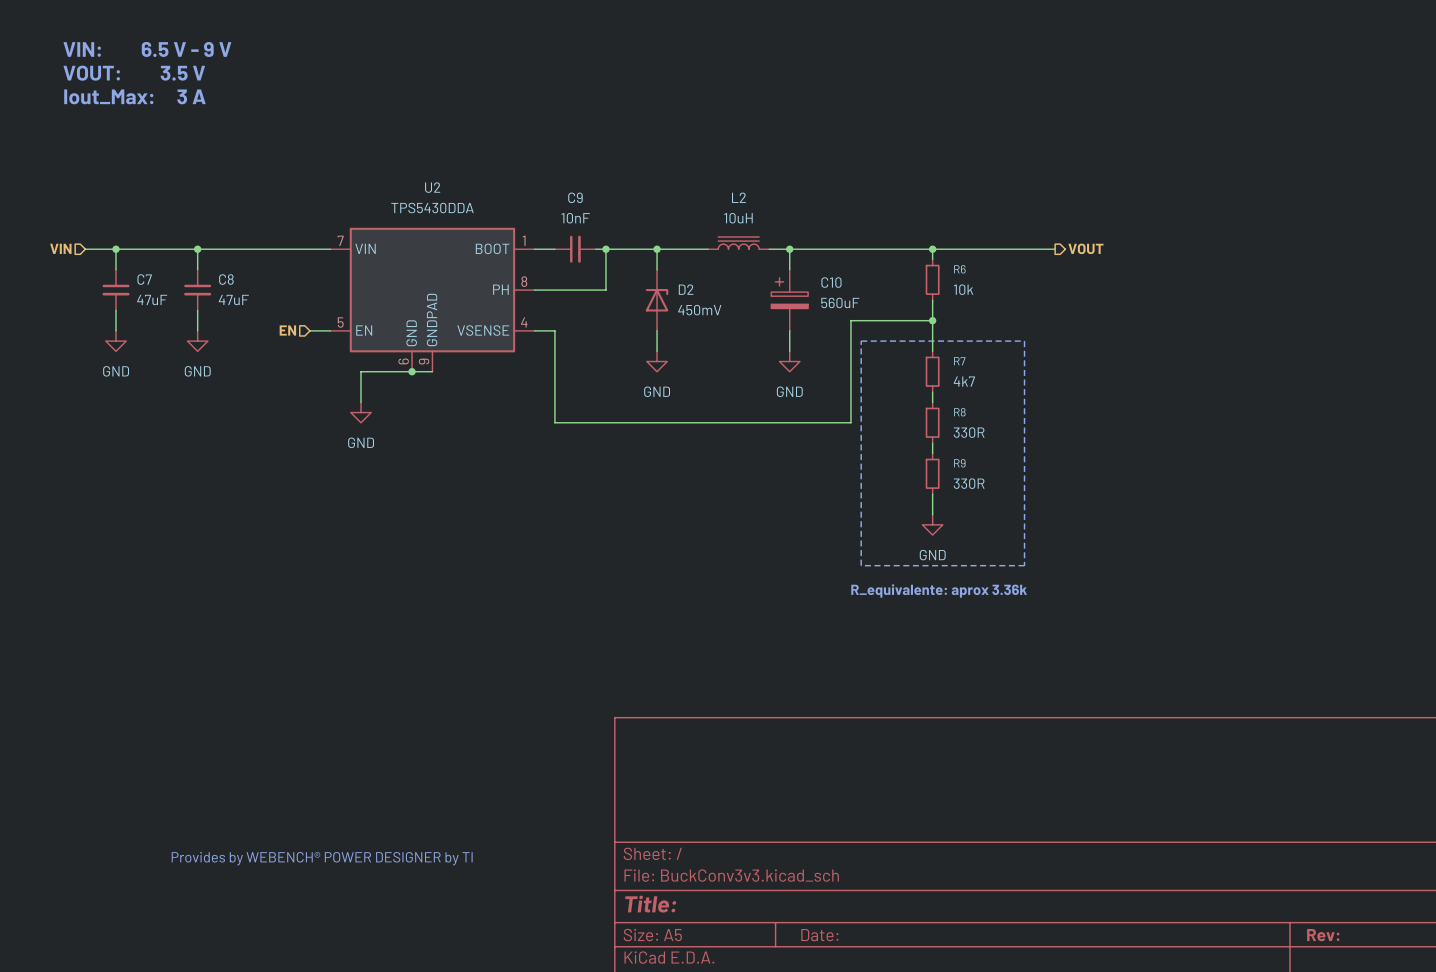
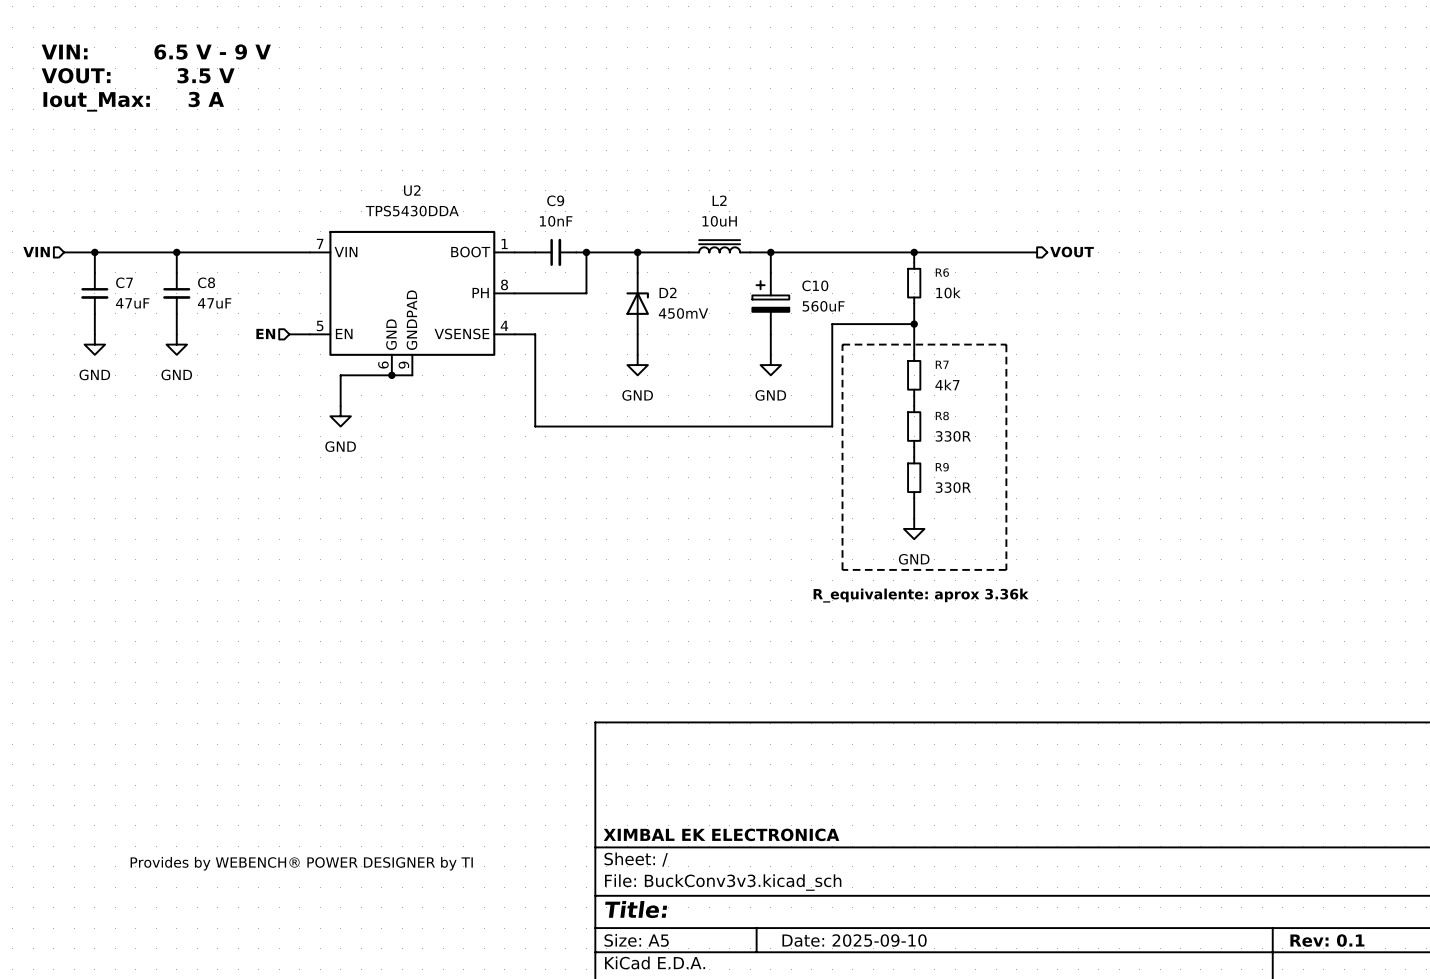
title block: none -> XIMBAL EK ELECTRONICA (721, 834)
title block: Date: (819, 935) -> Date: 2025-09-10 (854, 940)
title block: Rev: (1323, 935) -> Rev: 0.1 (1327, 940)

